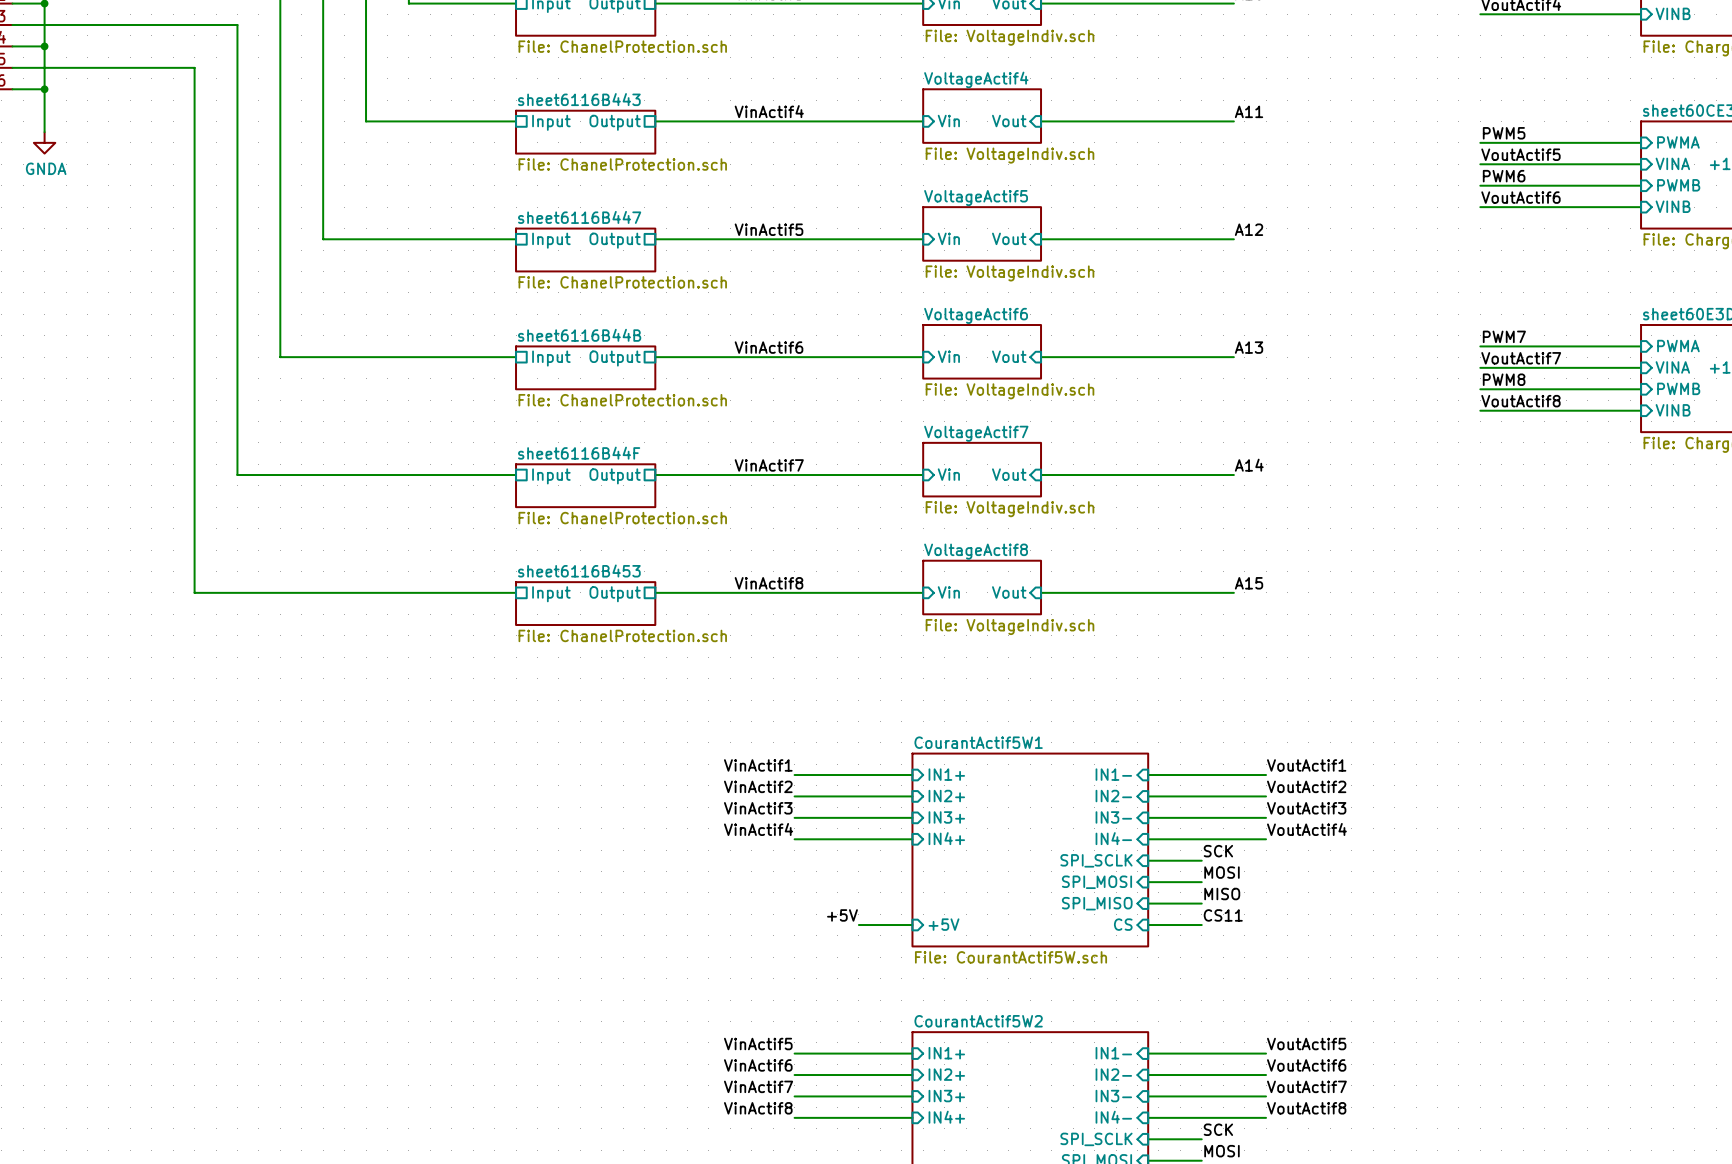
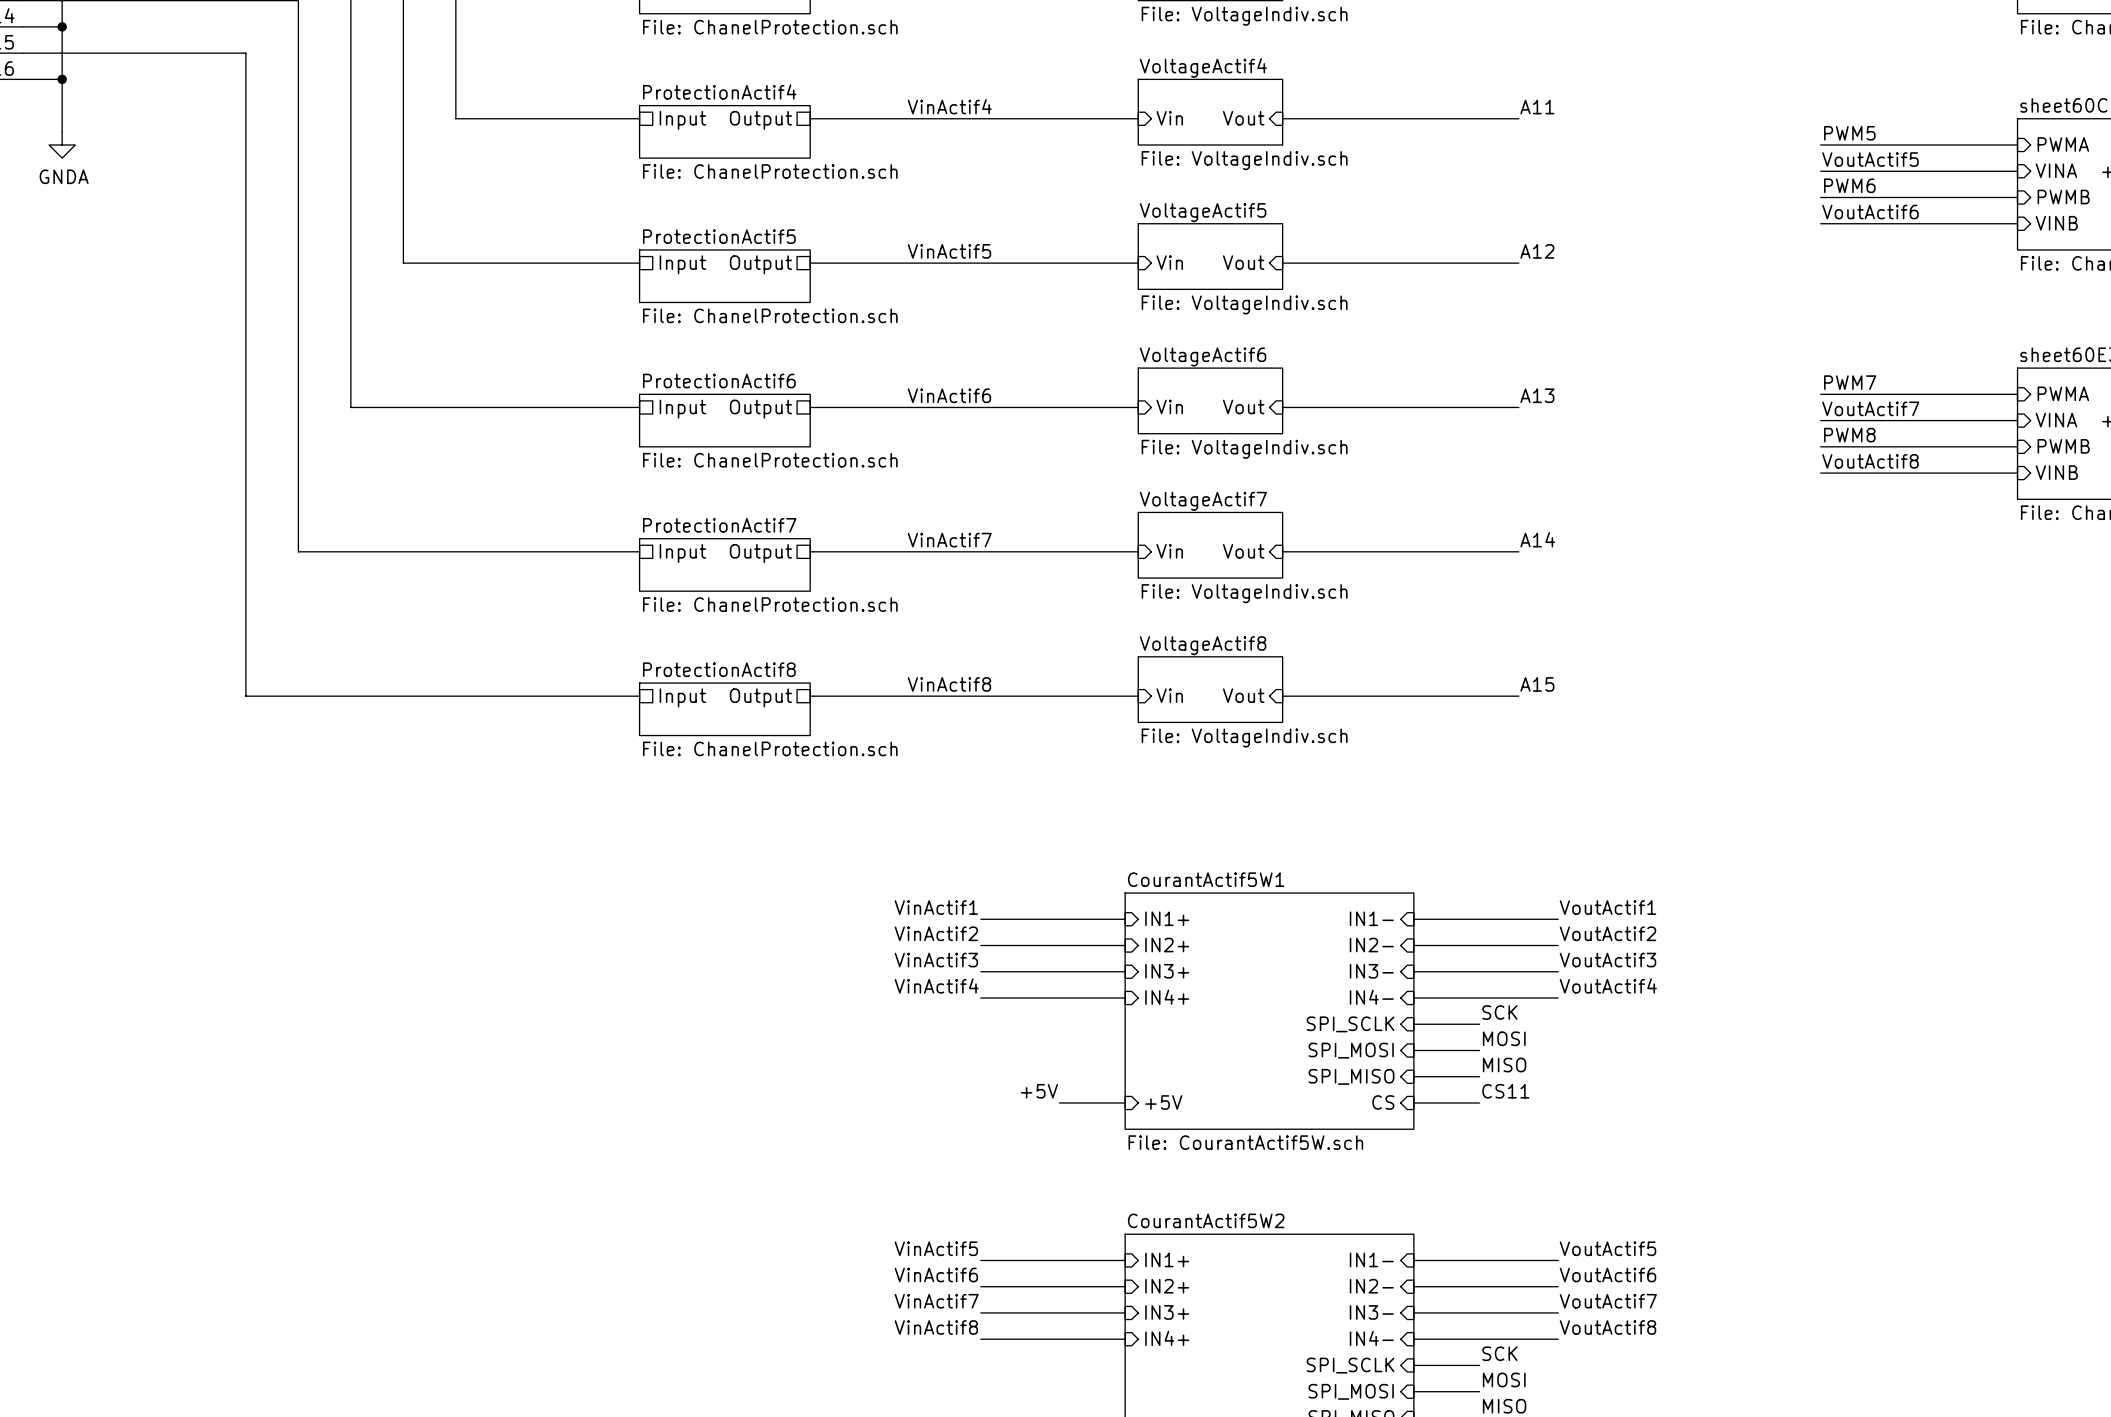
sheet sheet6116B443 name: sheet6116B443 (579, 99) -> ProtectionActif4 (719, 91)
sheet sheet6116B447 name: sheet6116B447 (579, 217) -> ProtectionActif5 (719, 236)
sheet sheet6116B44B name: sheet6116B44B (579, 335) -> ProtectionActif6 (719, 381)
sheet sheet6116B44F name: sheet6116B44F (579, 453) -> ProtectionActif7 (719, 525)
sheet sheet6116B453 name: sheet6116B453 (579, 571) -> ProtectionActif8 (719, 669)

